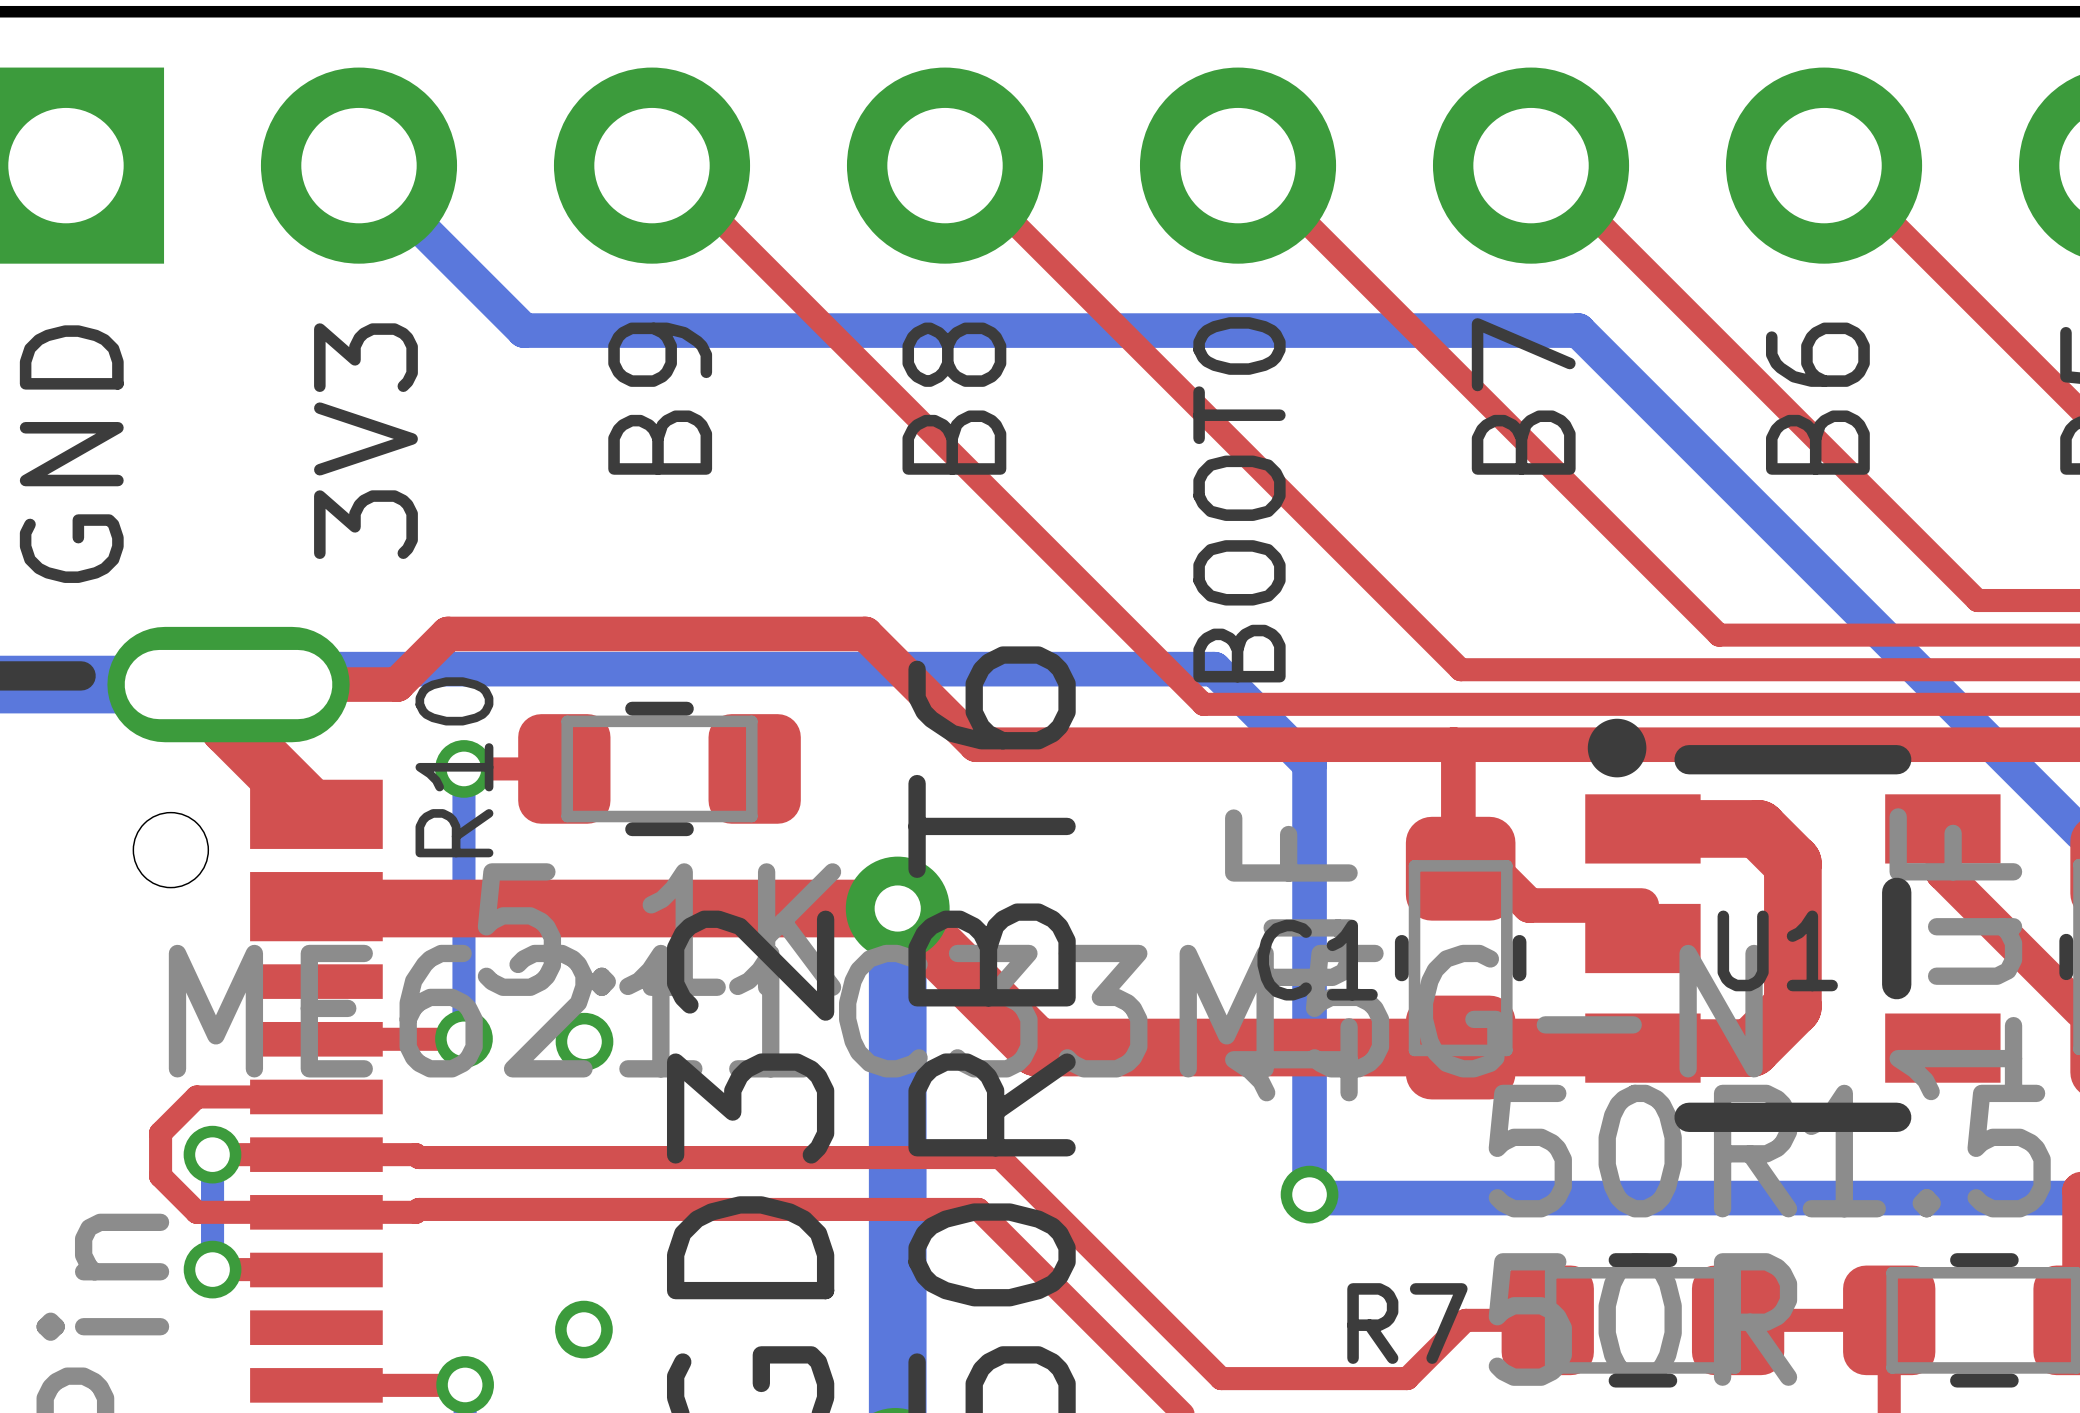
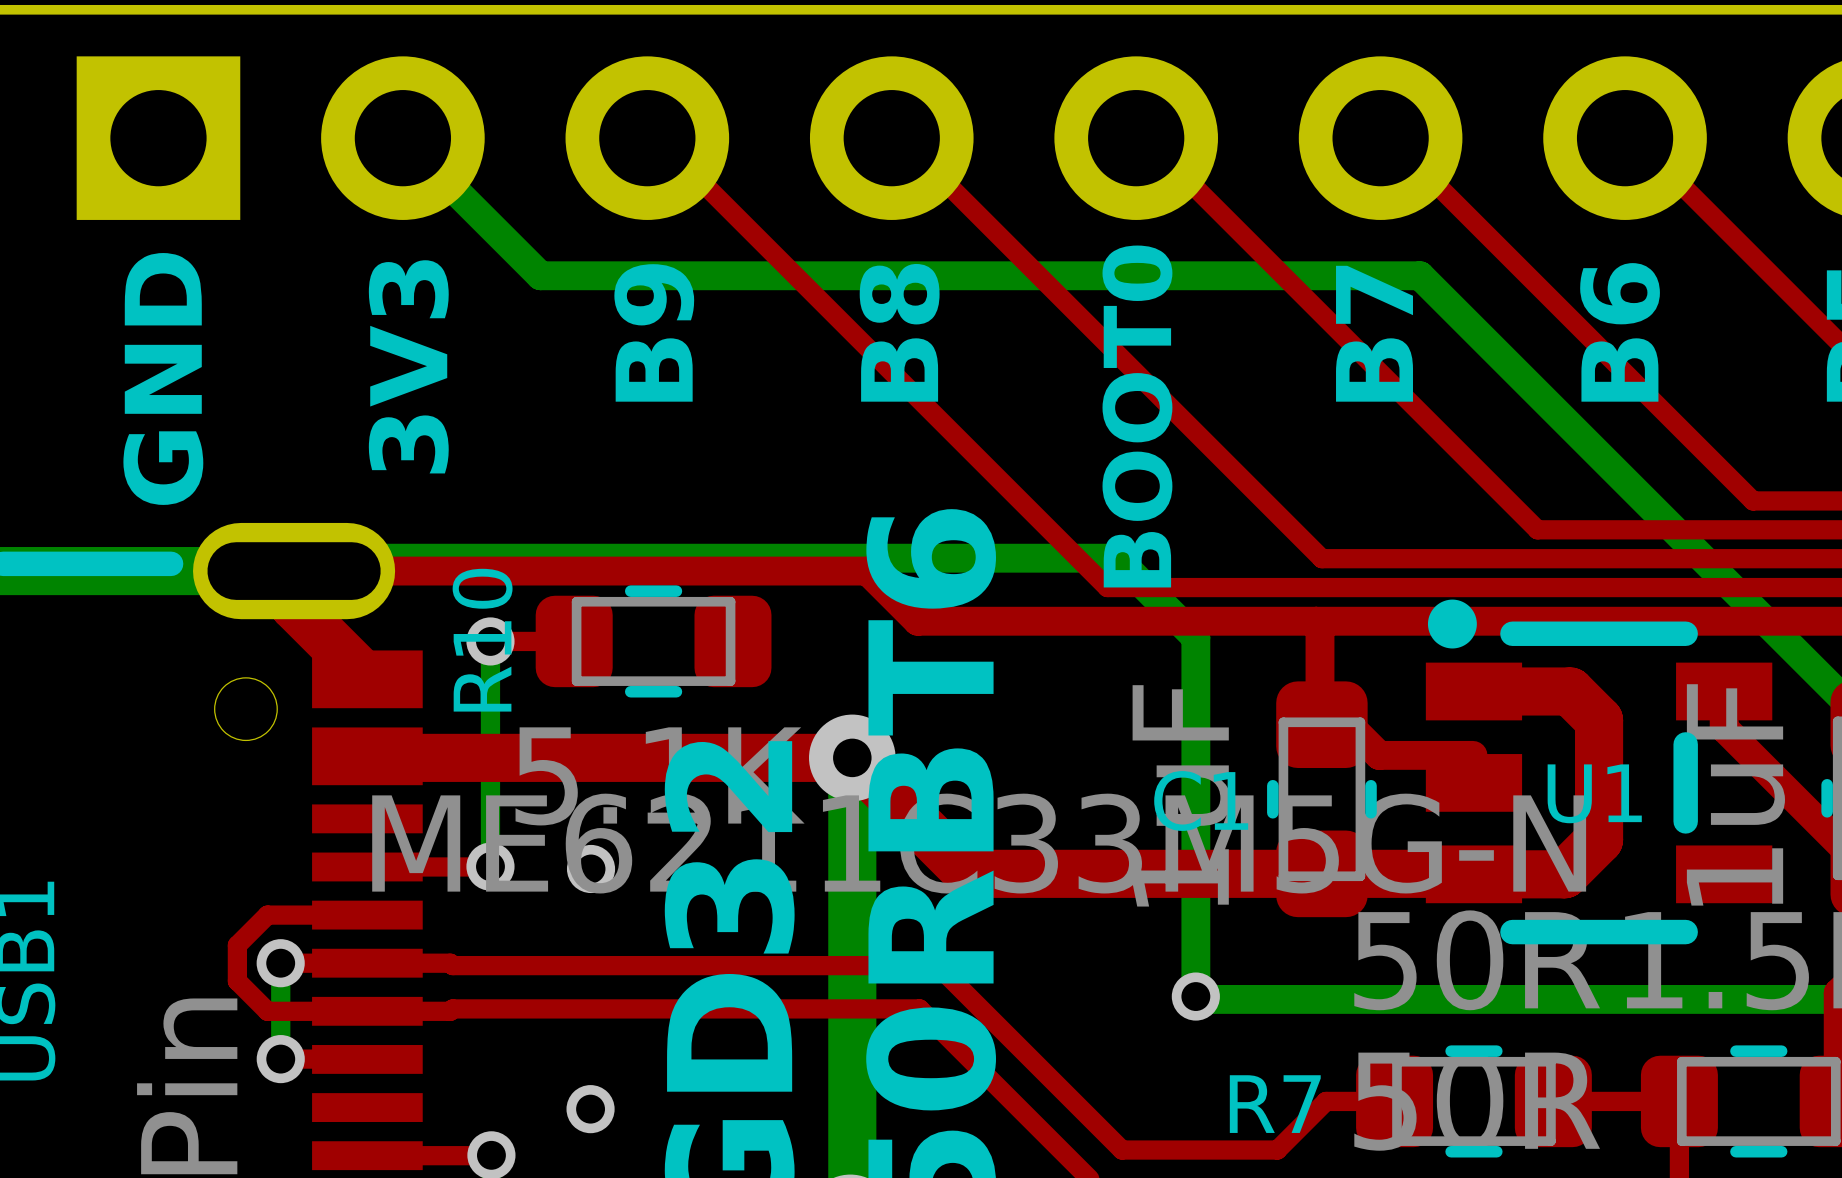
top track: (397, 684) (447, 633) (865, 633) (916, 684) -> (434, 571) (867, 571)

